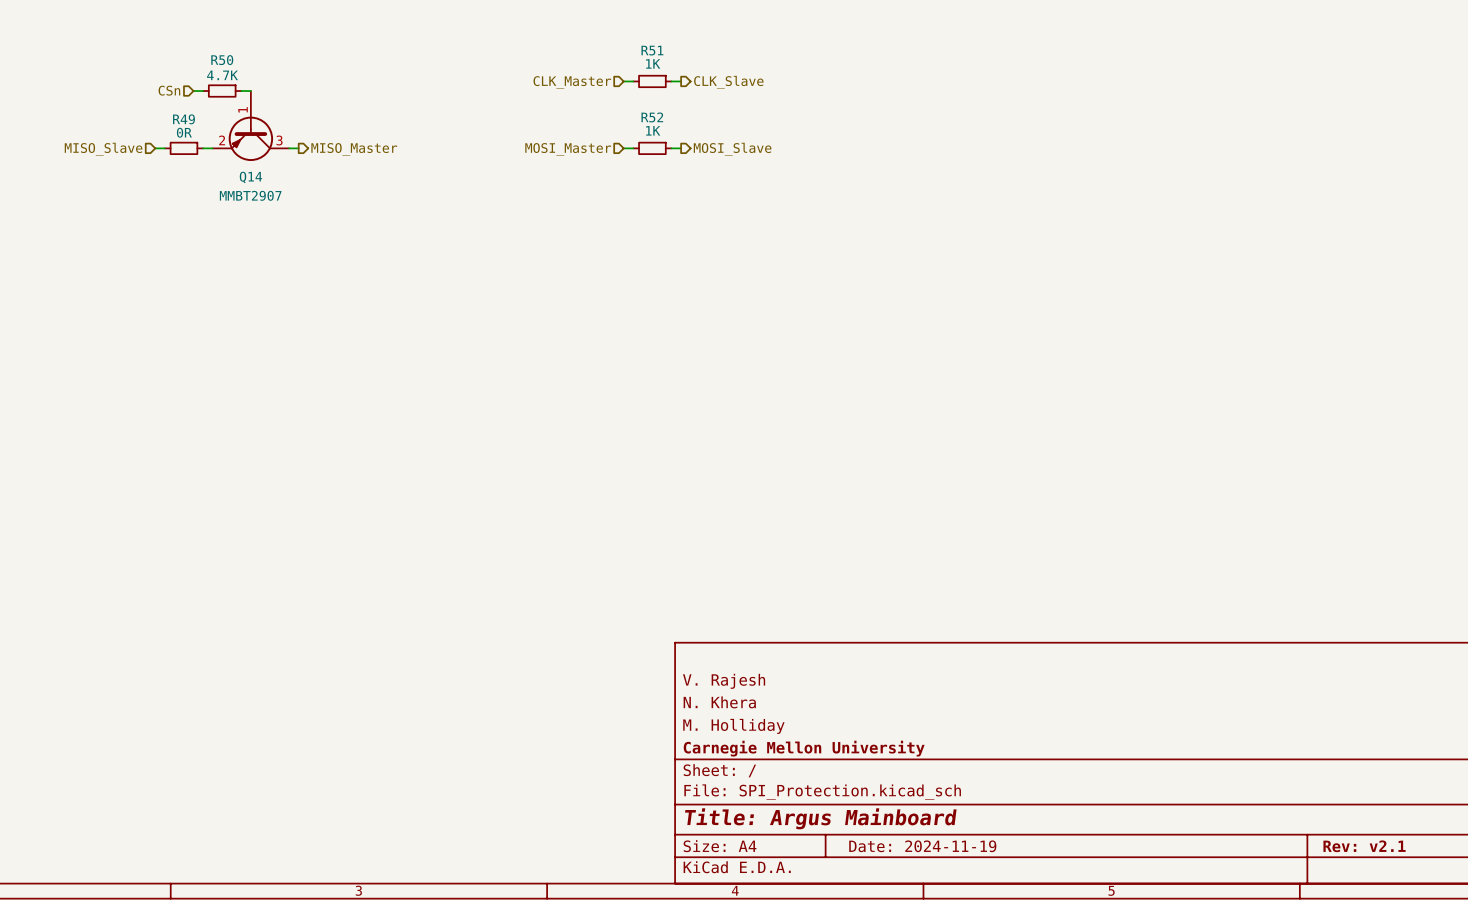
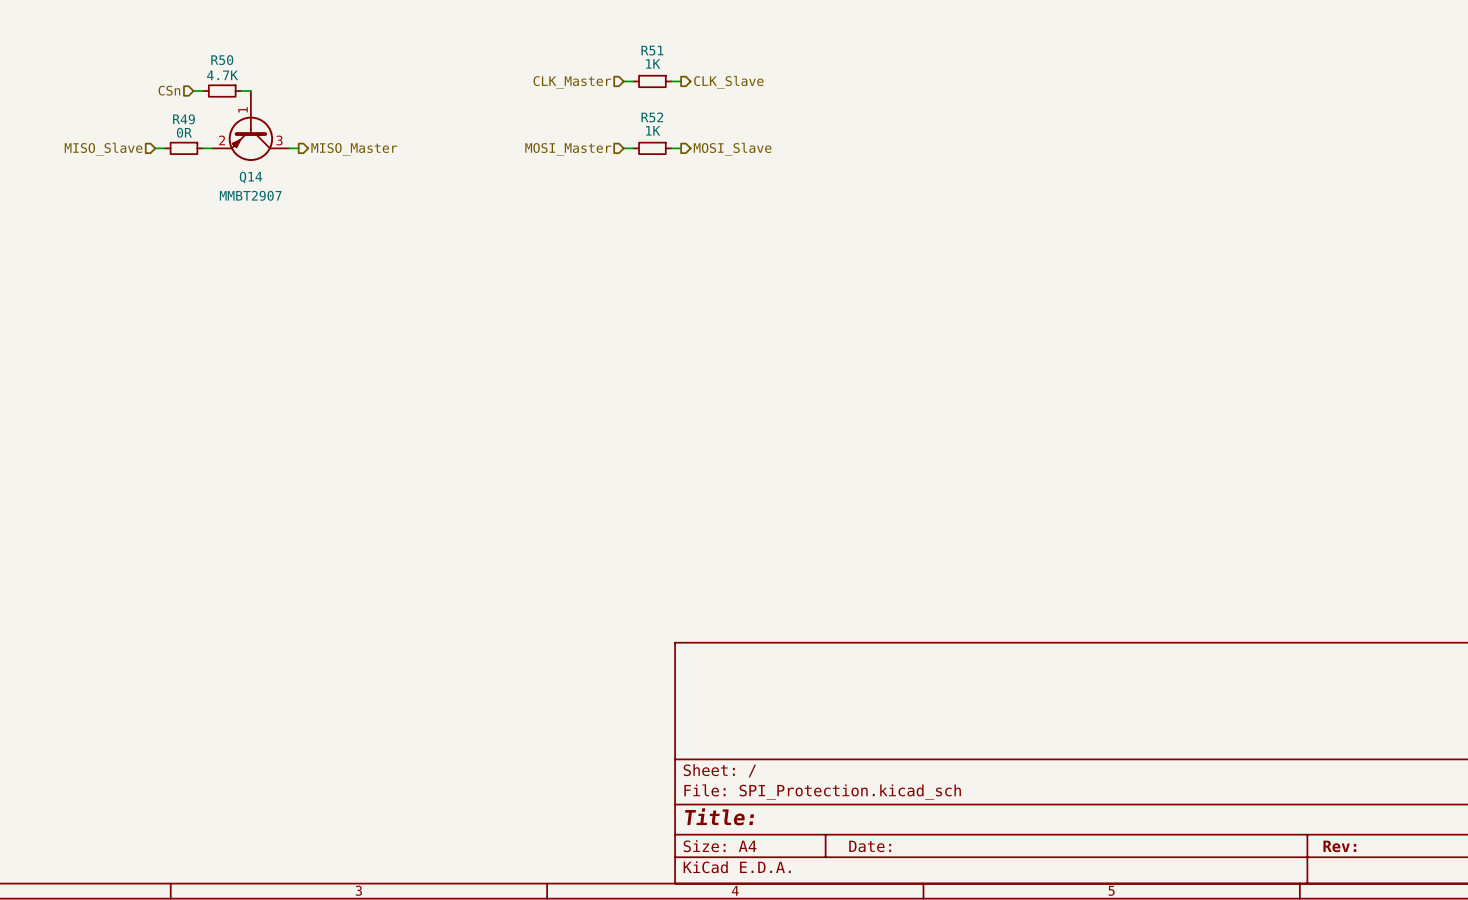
title block: V. Rajesh (724, 681) -> none
title block: N. Khera (719, 702) -> none
title block: M. Holliday (733, 726) -> none
title block: Carnegie Mellon University (804, 748) -> none
title block: Title: Argus Mainboard (820, 818) -> Title: (719, 816)
title block: Date: 2024-11-19 (922, 846) -> Date: (870, 846)
title block: Rev: v2.1 (1364, 846) -> Rev: (1339, 846)

